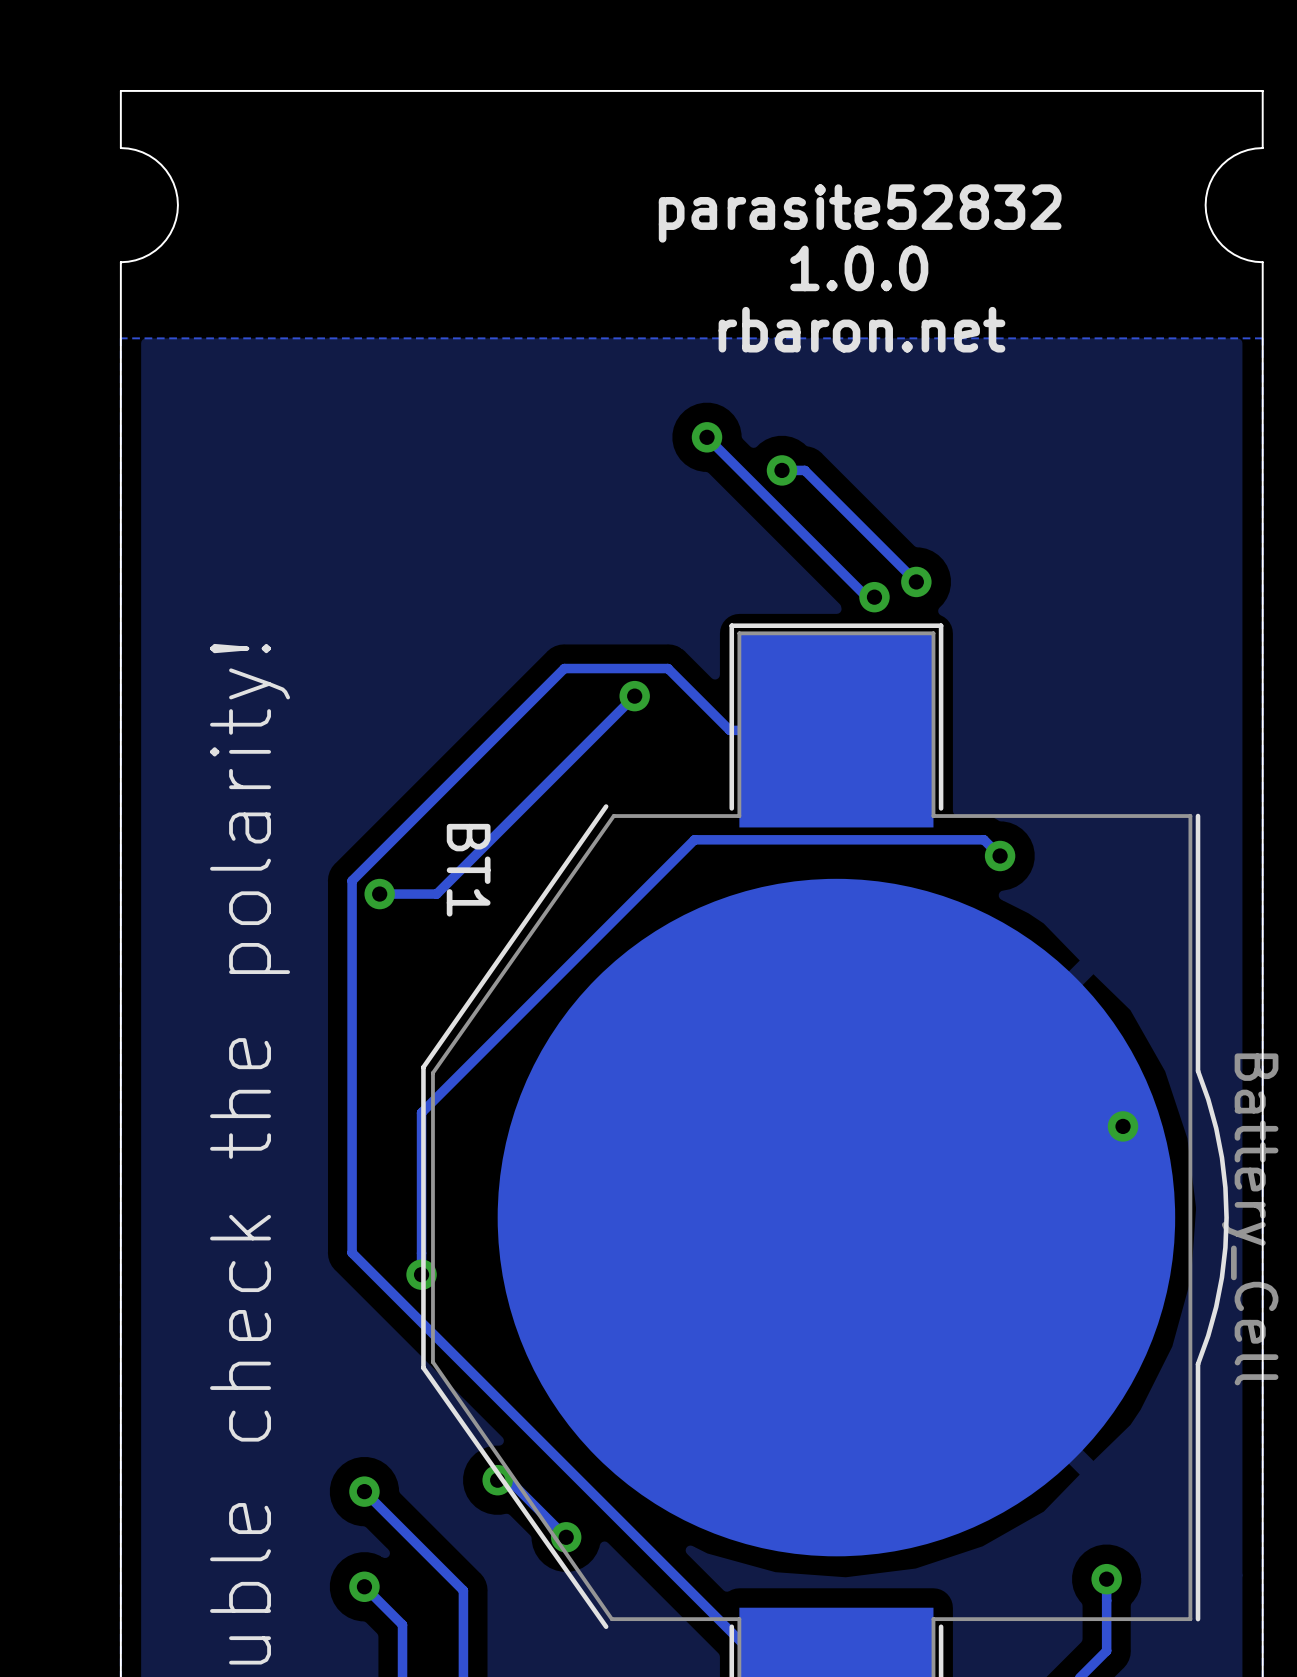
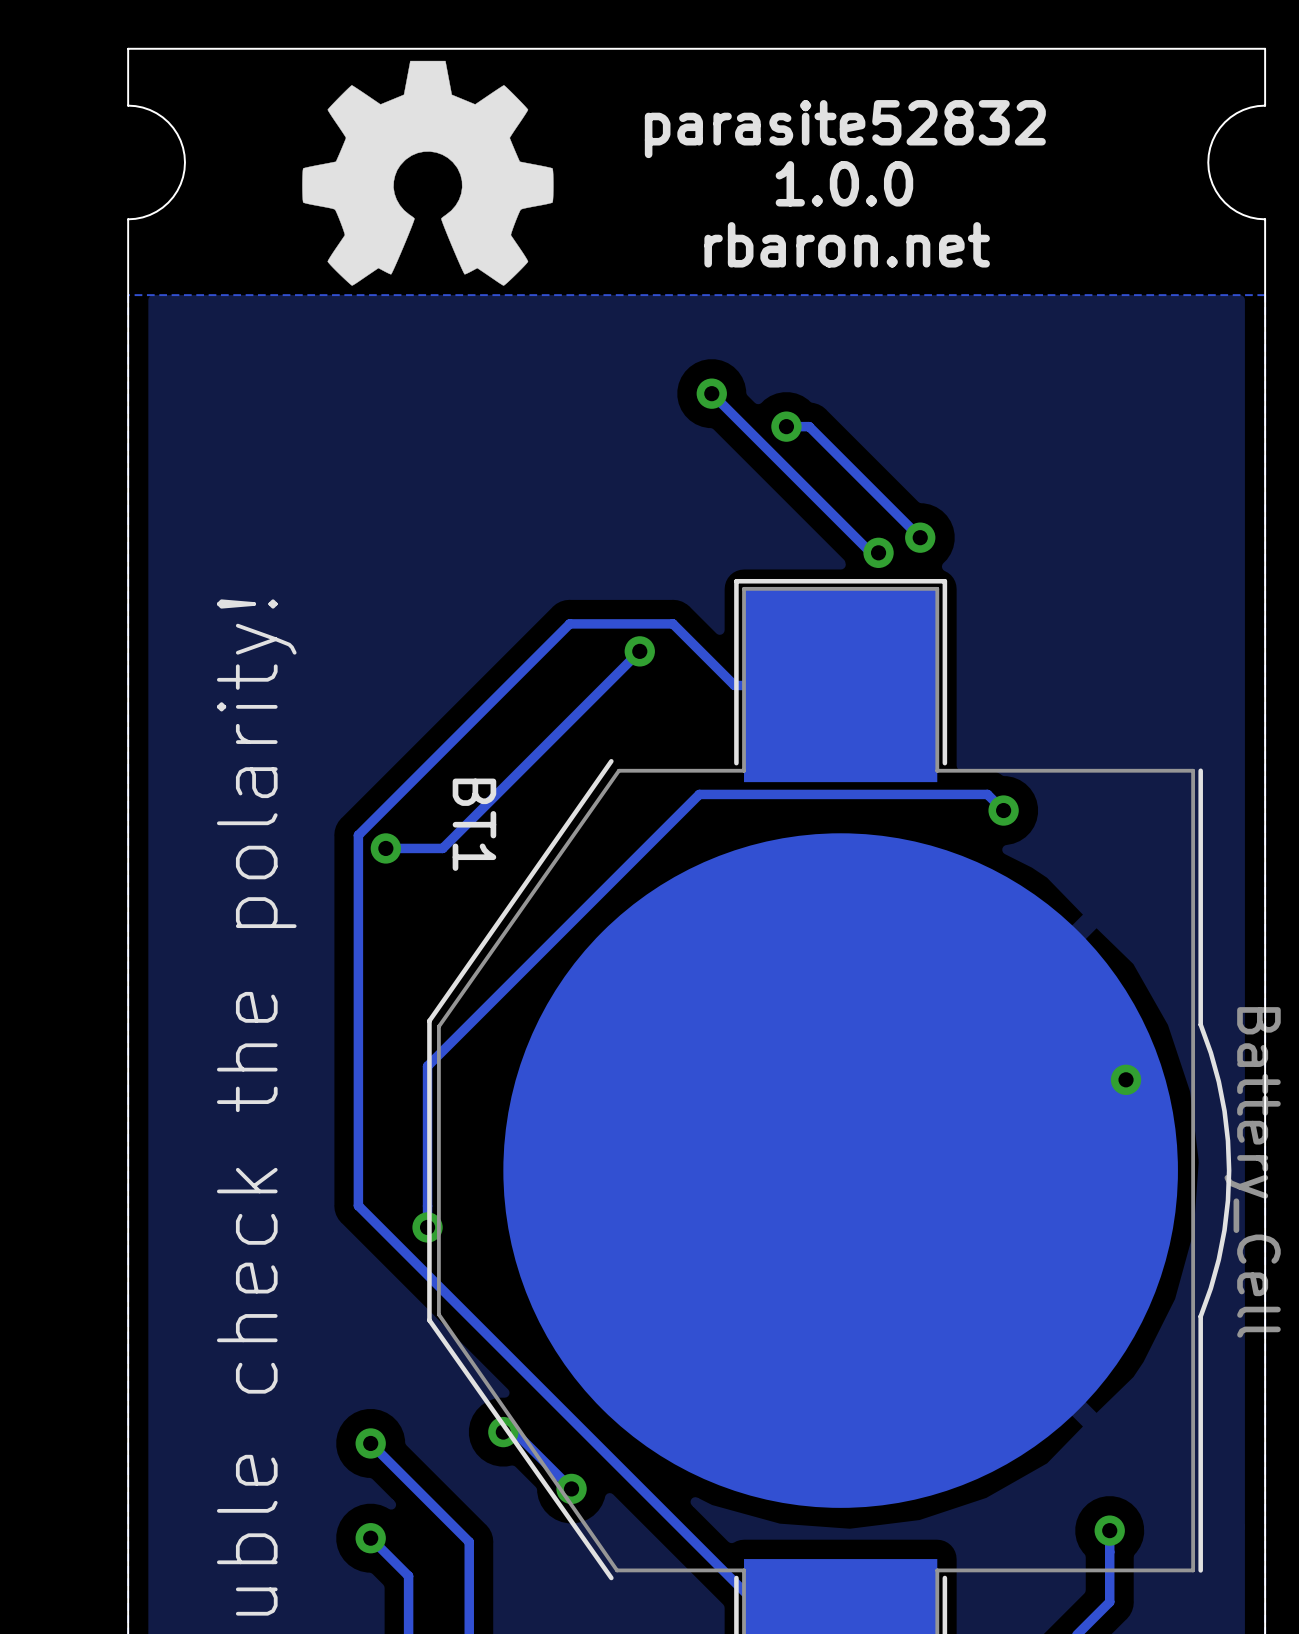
drawing: none -> [302, 60, 554, 286]
text position: parasite52832 (860, 213) -> parasite52832 (845, 129)
text position: 1.0.0 (859, 268) -> 1.0.0 (844, 183)
text position: rbaron.net (861, 329) -> rbaron.net (847, 244)

